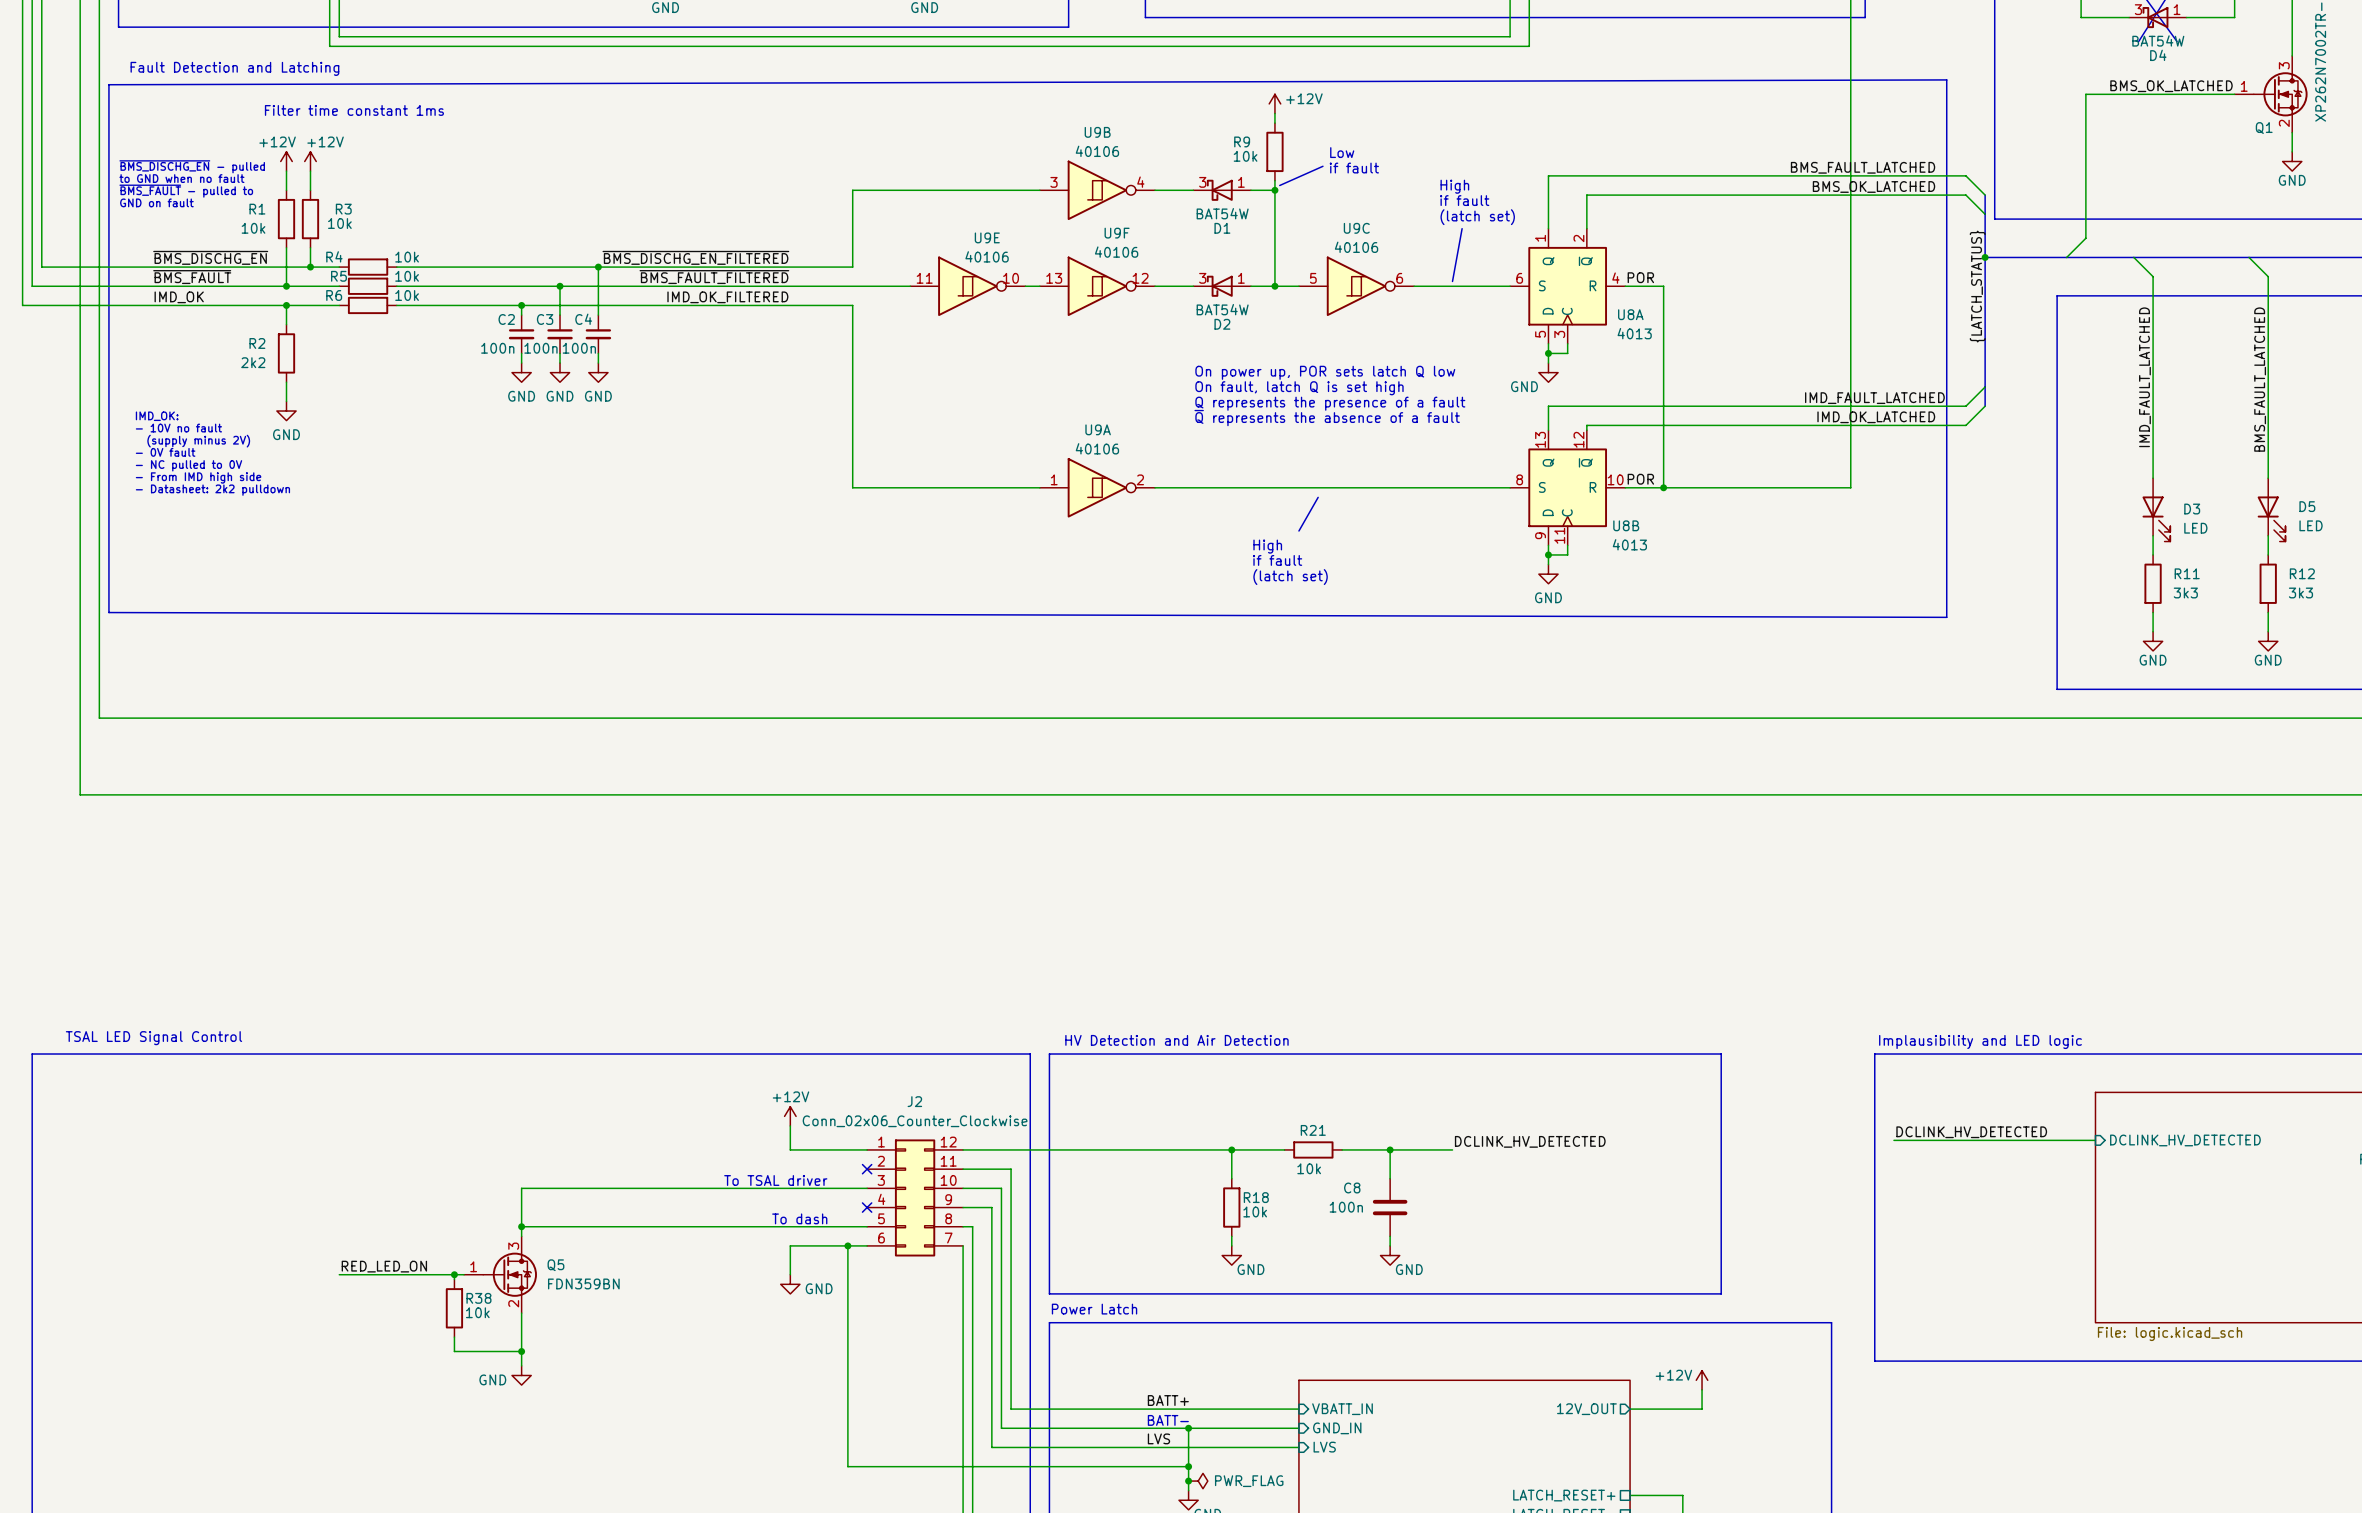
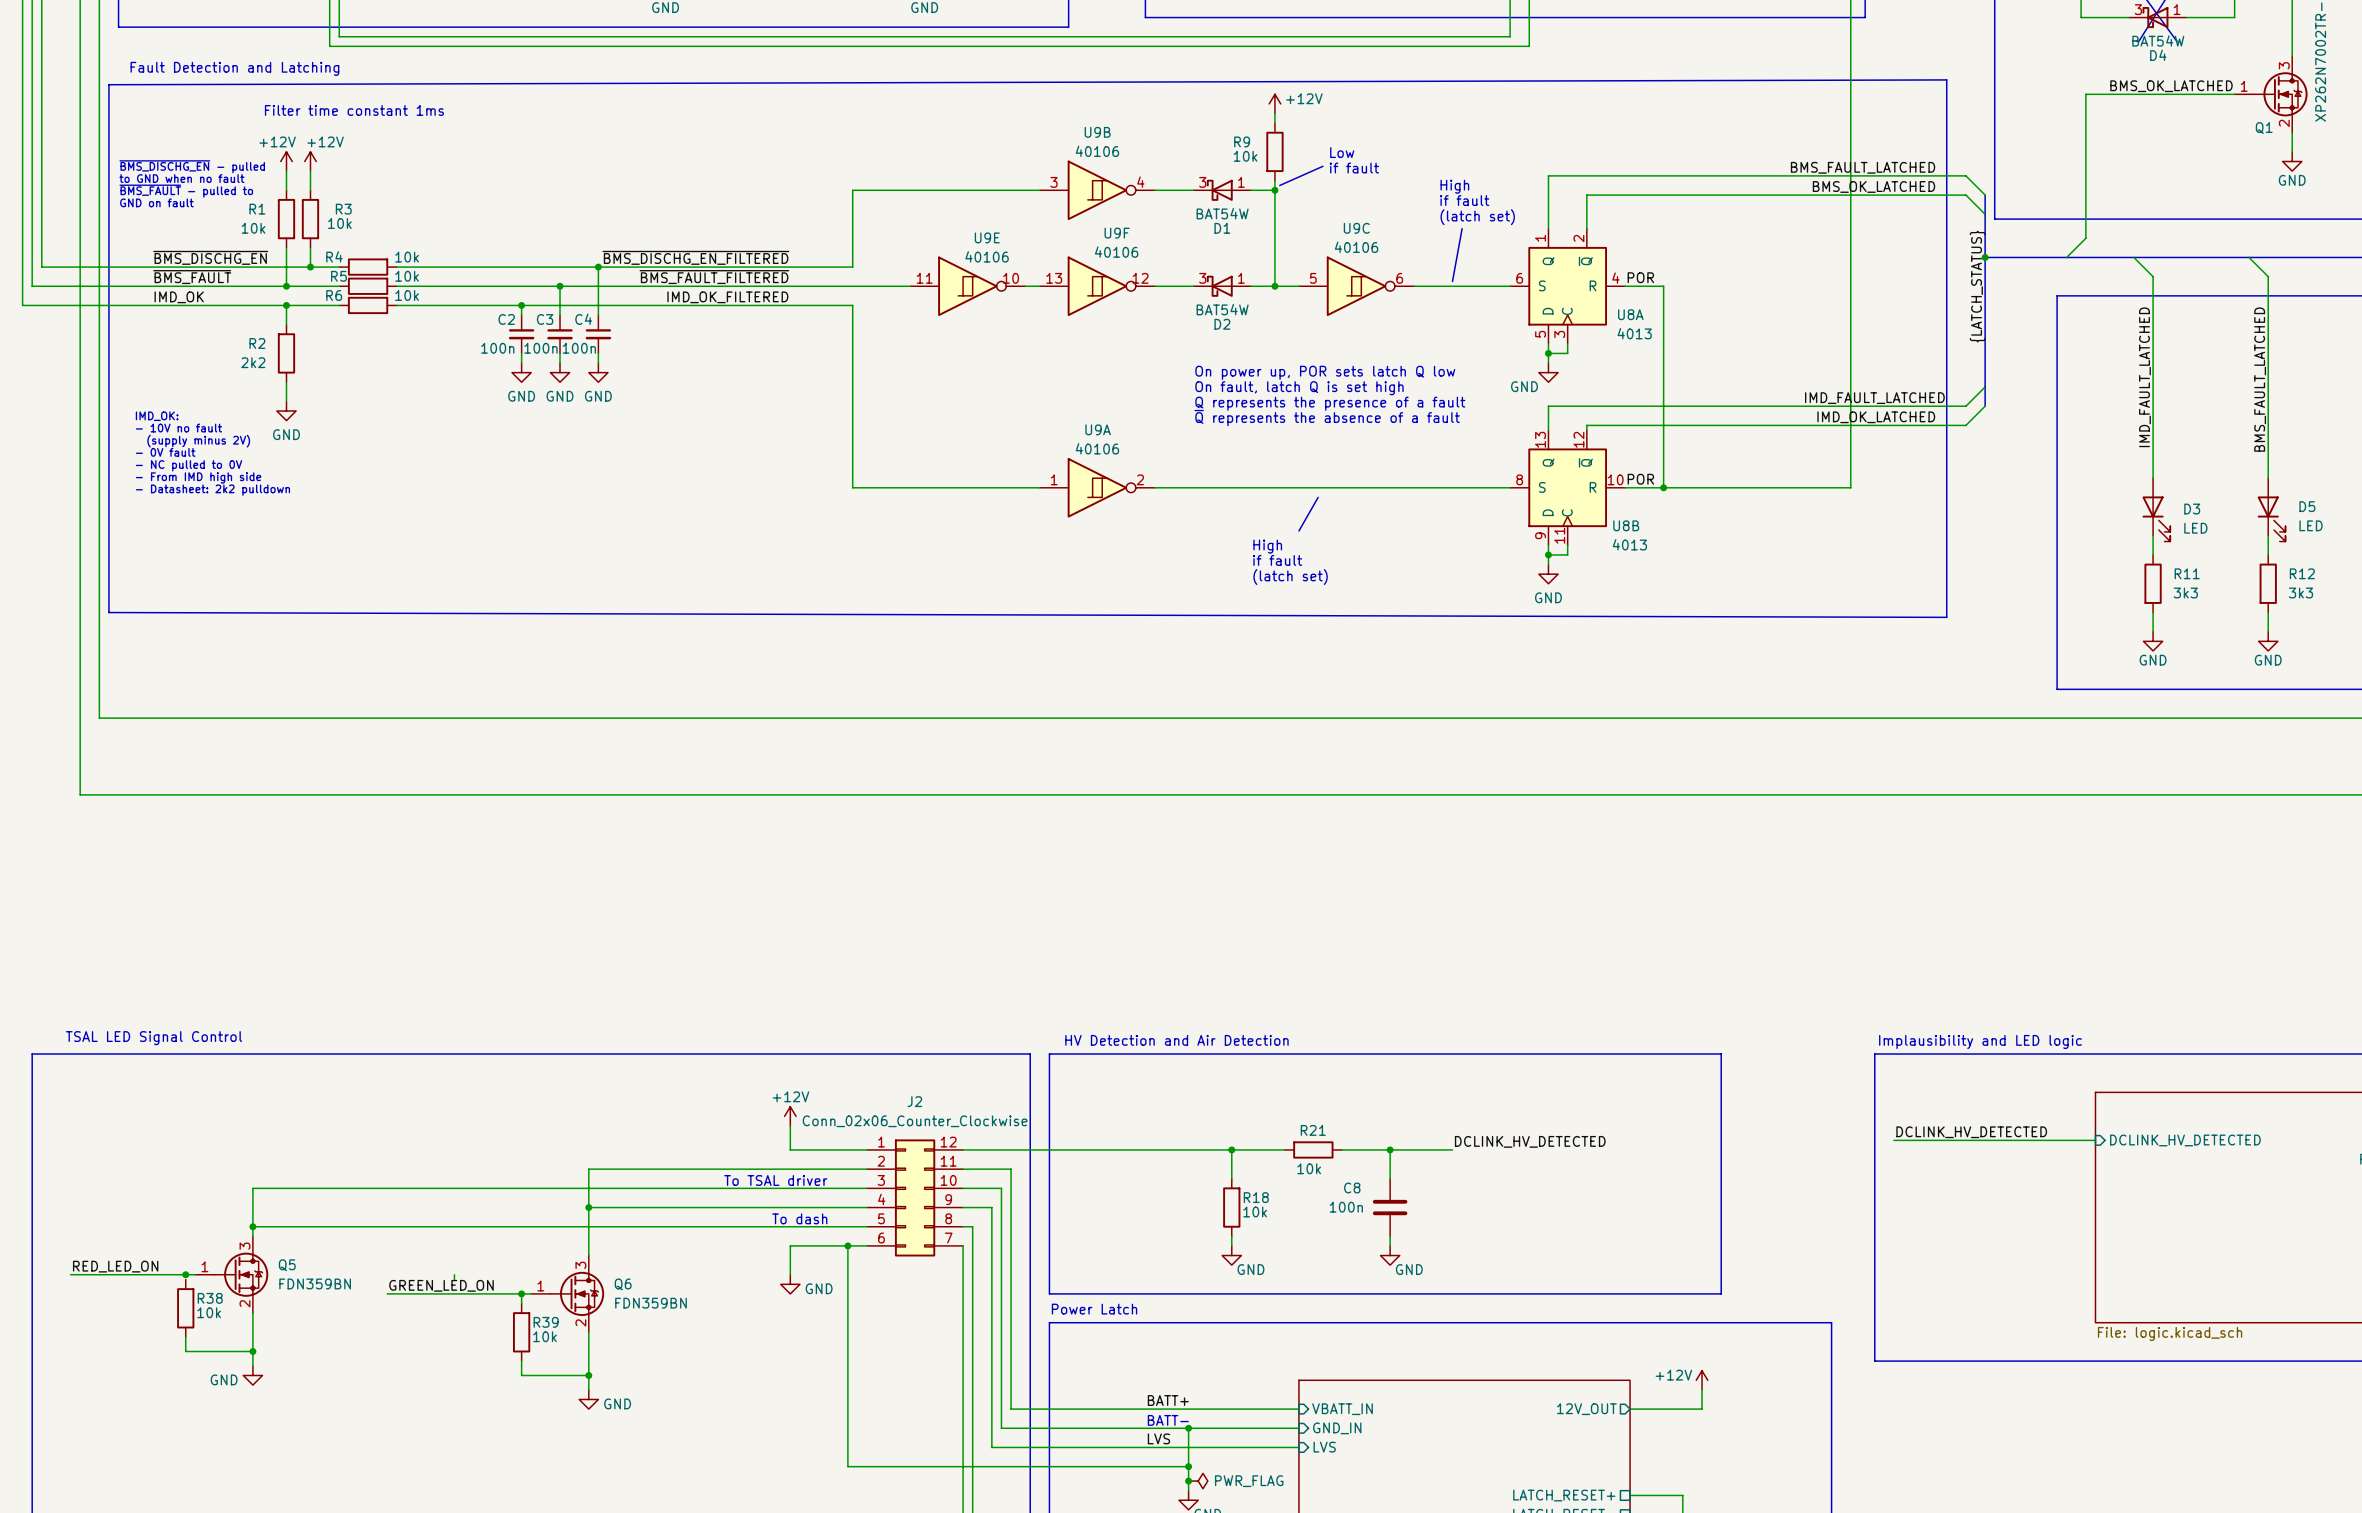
wire: none -> (867, 1169) (588, 1169) (588, 1255)
no-connect mark: (867, 1169) -> none
wire: (521, 1188) (521, 1236) -> (521, 1188) (252, 1188) (252, 1236)
wire: none -> (588, 1207) (867, 1207)
junction: none -> (588, 1207)
no-connect mark: (867, 1207) -> none
wire: none -> (252, 1226) (521, 1226)
junction: none -> (252, 1226)
junction: (521, 1226) -> none
label: none -> RED_LED_ON (115, 1266)
label: RED_LED_ON (384, 1266) -> GREEN_LED_ON (441, 1285)
wire: none -> (70, 1274) (195, 1274)
junction: none -> (185, 1274)
wire: (339, 1274) (464, 1274) -> none
junction: (454, 1274) -> none
Q5 position: (500, 1274) -> (231, 1274)
wire: none -> (387, 1293) (531, 1293)
junction: none -> (521, 1293)
Q6: none -> FDN359BN (567, 1293)
R38 position: (454, 1308) -> (185, 1308)
wire: none -> (252, 1313) (252, 1365)
wire: (521, 1313) (521, 1361) -> none
R39: none -> 10k (521, 1332)
wire: none -> (588, 1332) (588, 1389)
wire: none -> (185, 1337) (185, 1351) (252, 1351)
wire: (454, 1337) (454, 1351) (521, 1351) -> none
junction: none -> (252, 1351)
junction: (521, 1351) -> none
wire: none -> (521, 1365) (521, 1375) (588, 1375)
power symbol: none -> GND (252, 1375)
power symbol position: GND (521, 1375) -> GND (588, 1399)
junction: none -> (588, 1375)
power symbol text position: GND (492, 1379) -> GND (617, 1403)

